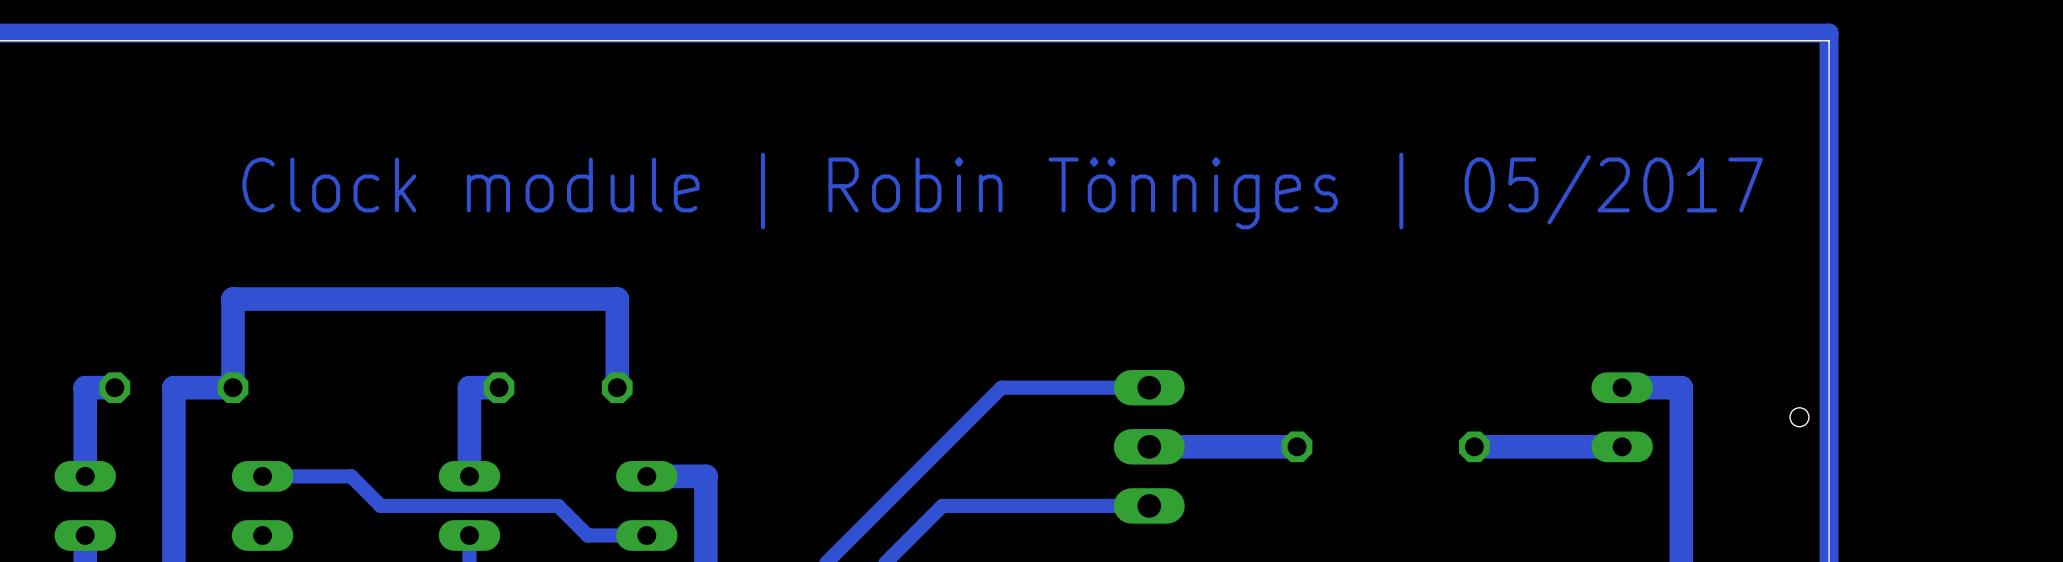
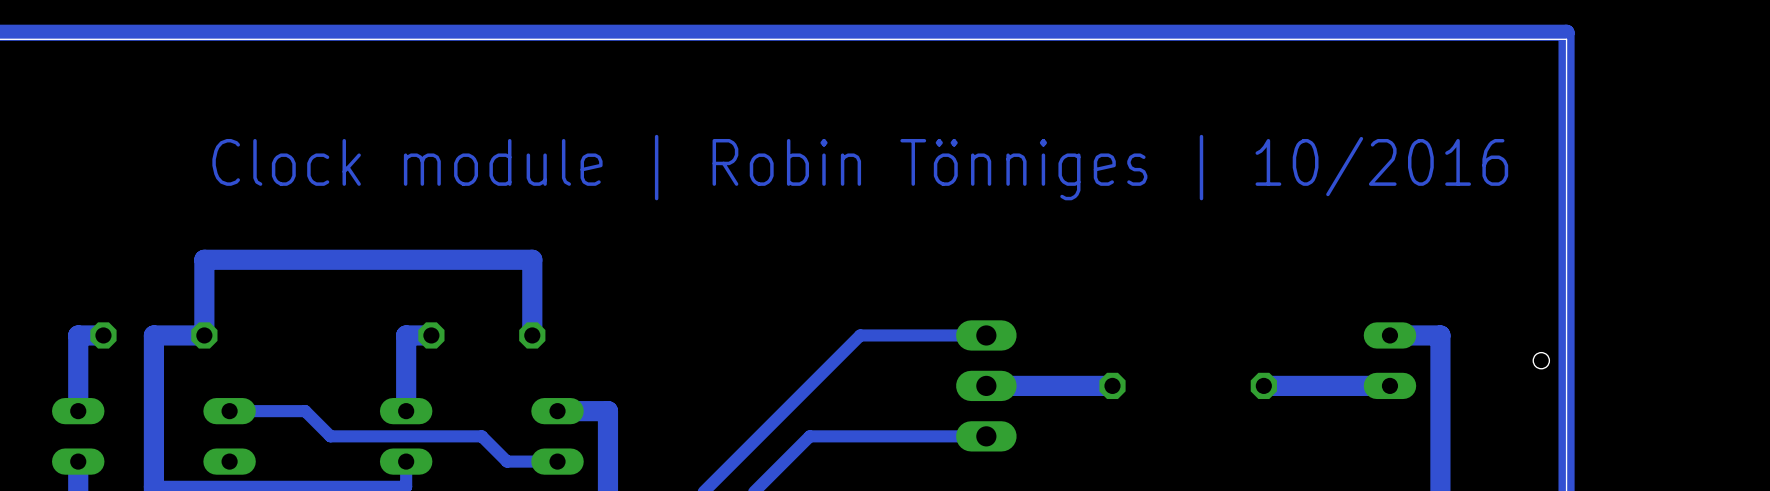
text: Clock module | Robin Tönniges | 05/2017 (1002, 191) -> Clock module | Robin Tönniges | 10/2016 (860, 167)

